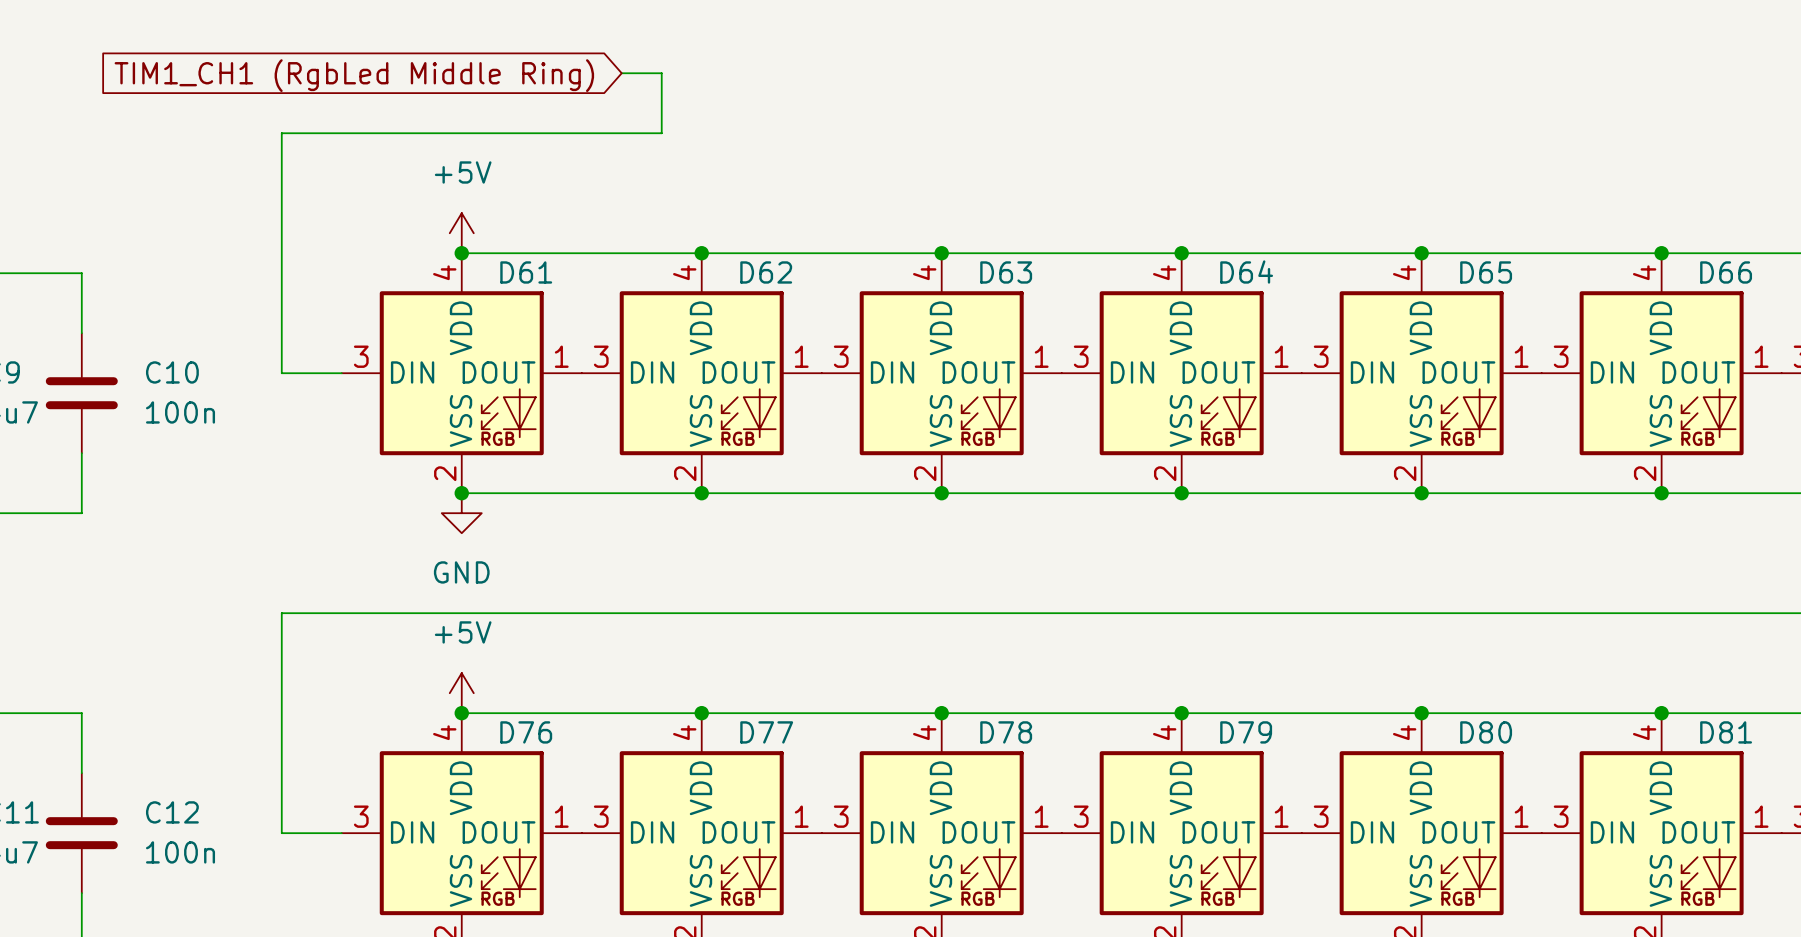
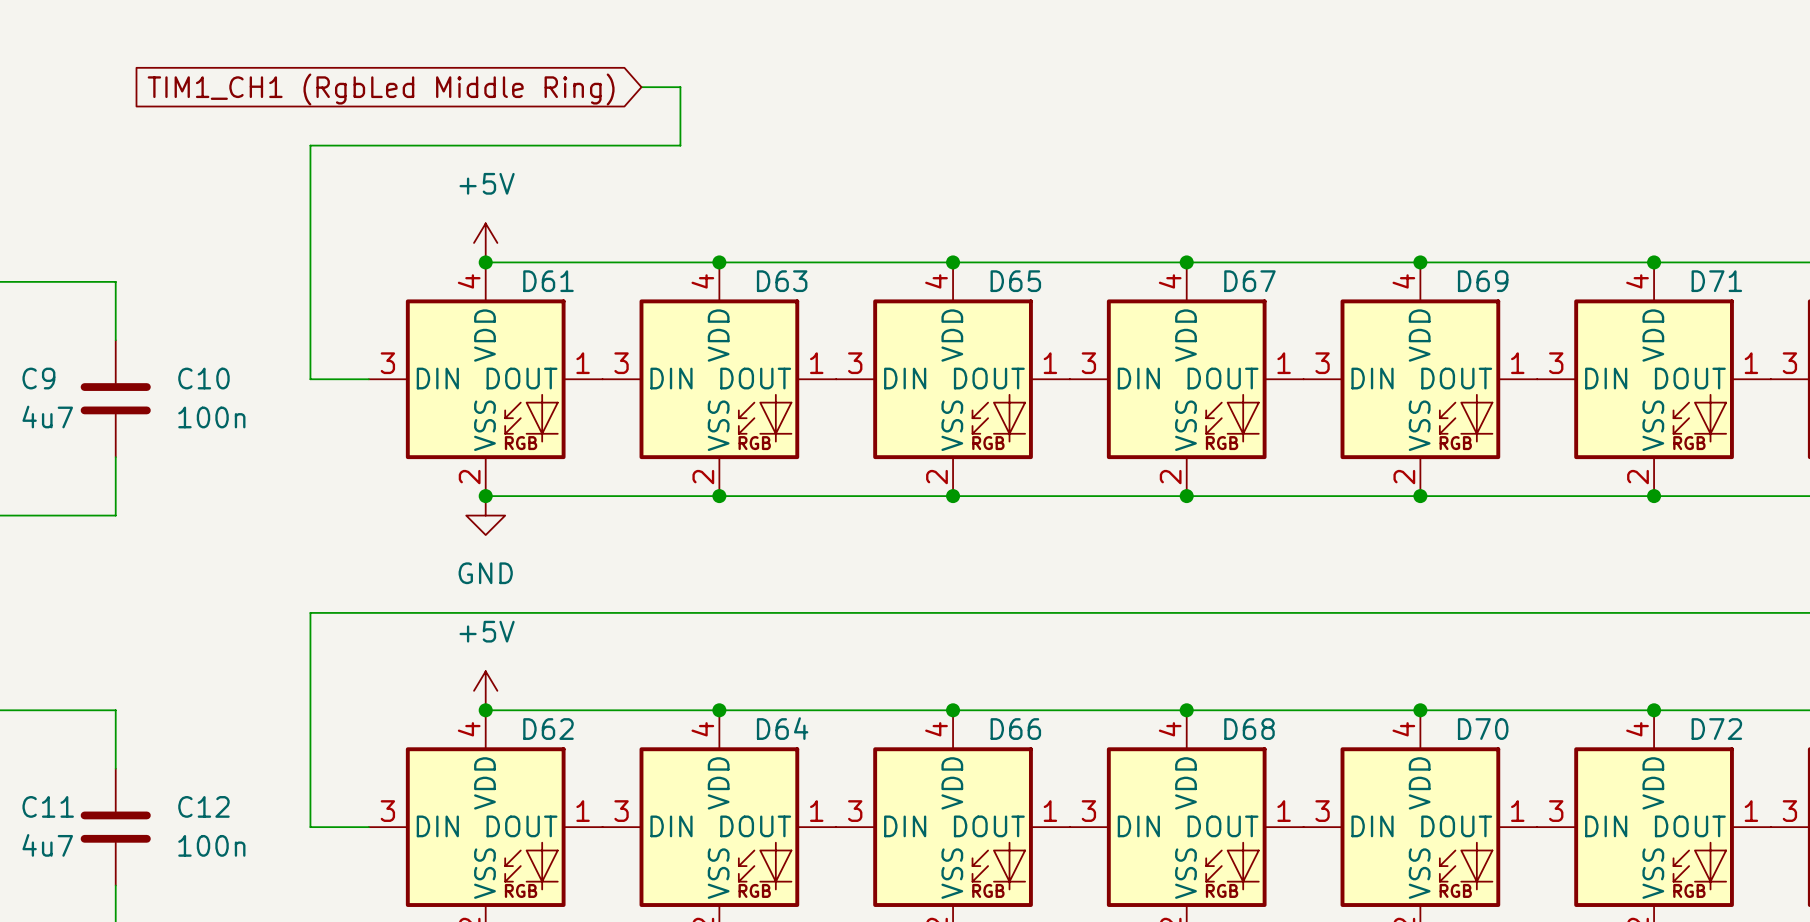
D62 name: D62 (766, 272) -> D63 (782, 281)
D63 name: D63 (1006, 272) -> D65 (1015, 281)
D64 name: D64 (1246, 272) -> D67 (1249, 281)
D65 name: D65 (1486, 272) -> D69 (1483, 281)
D66 name: D66 (1726, 272) -> D71 (1716, 281)
D76 name: D76 (526, 732) -> D62 (548, 729)
D77 name: D77 (766, 732) -> D64 (782, 728)
D78 name: D78 (1006, 732) -> D66 (1015, 729)
D79 name: D79 (1246, 732) -> D68 (1249, 729)
D80 name: D80 (1486, 732) -> D70 (1483, 729)
D81 name: D81 (1726, 732) -> D72 (1716, 729)

